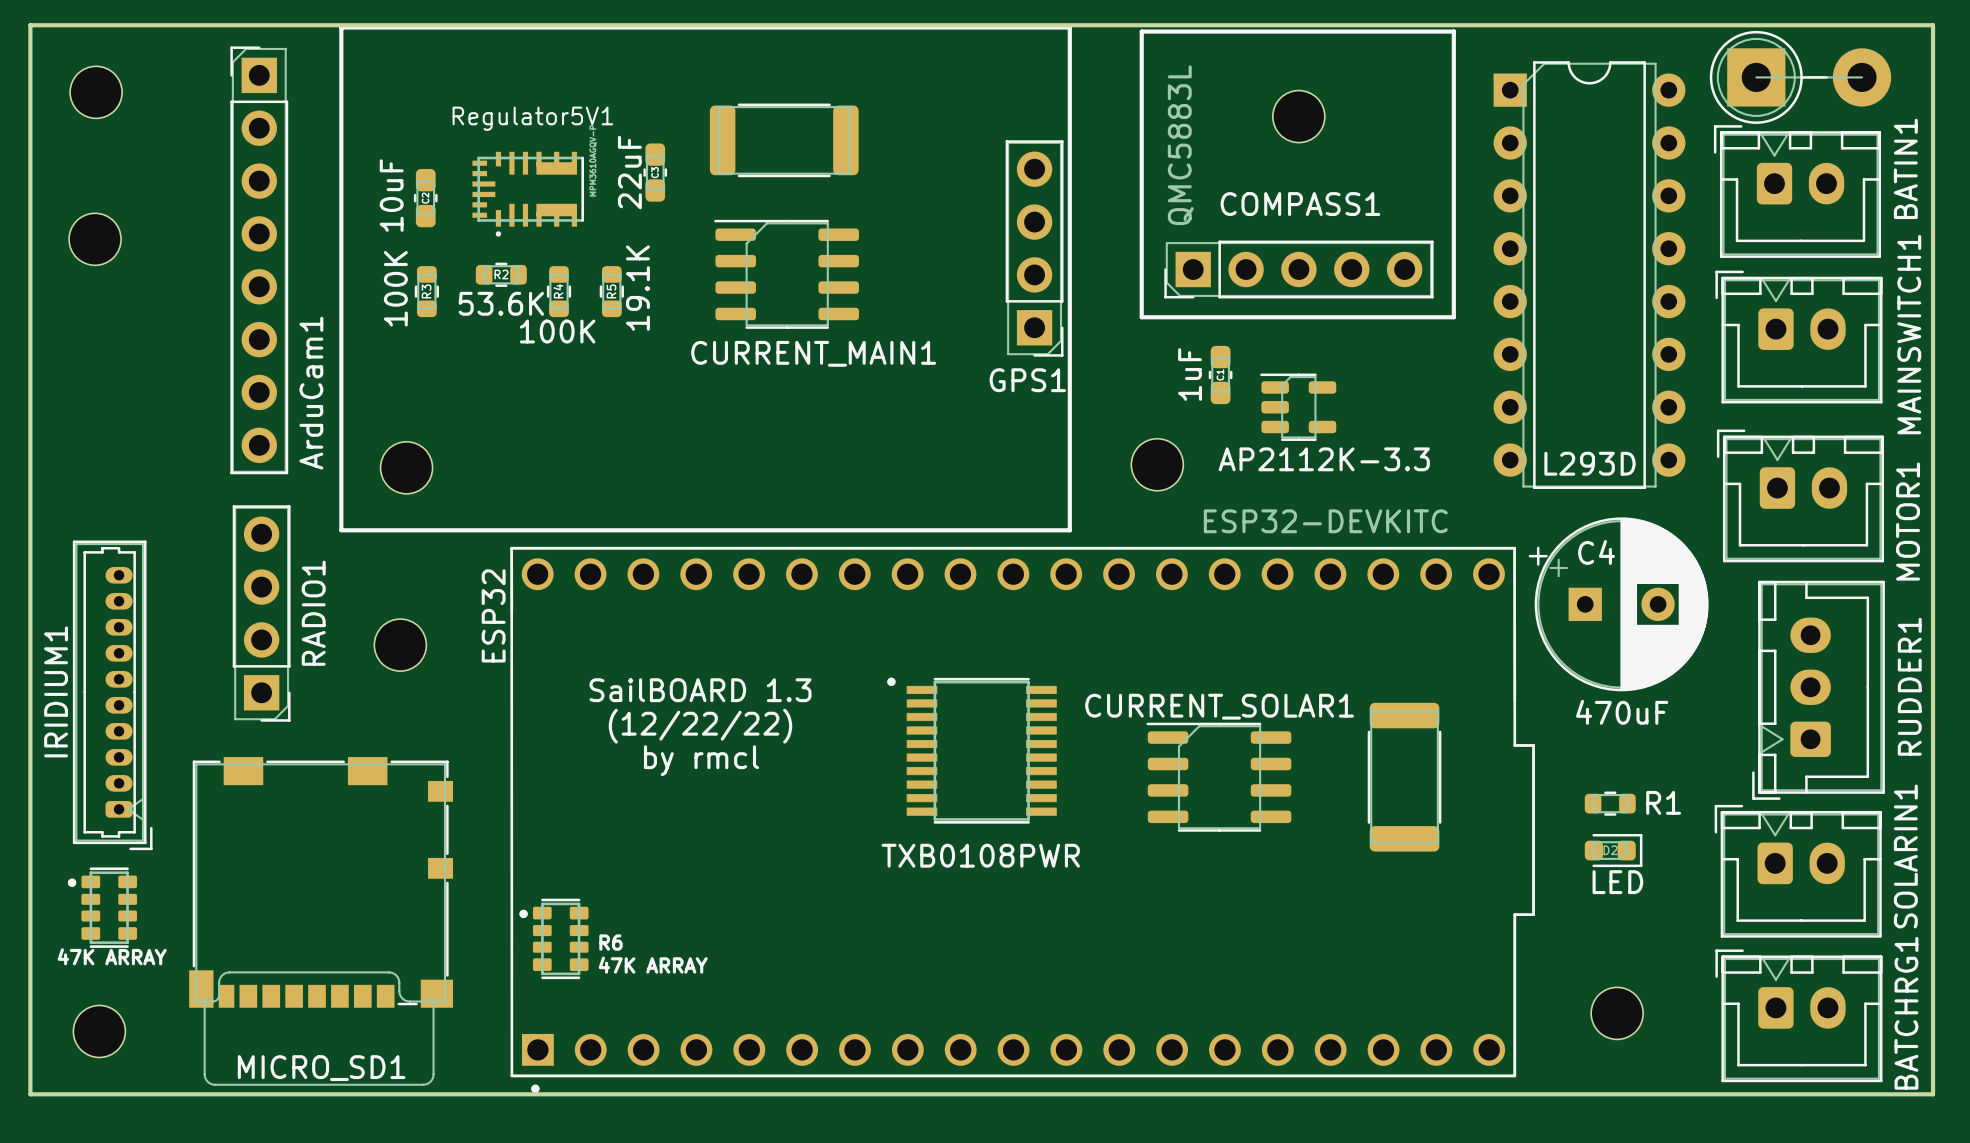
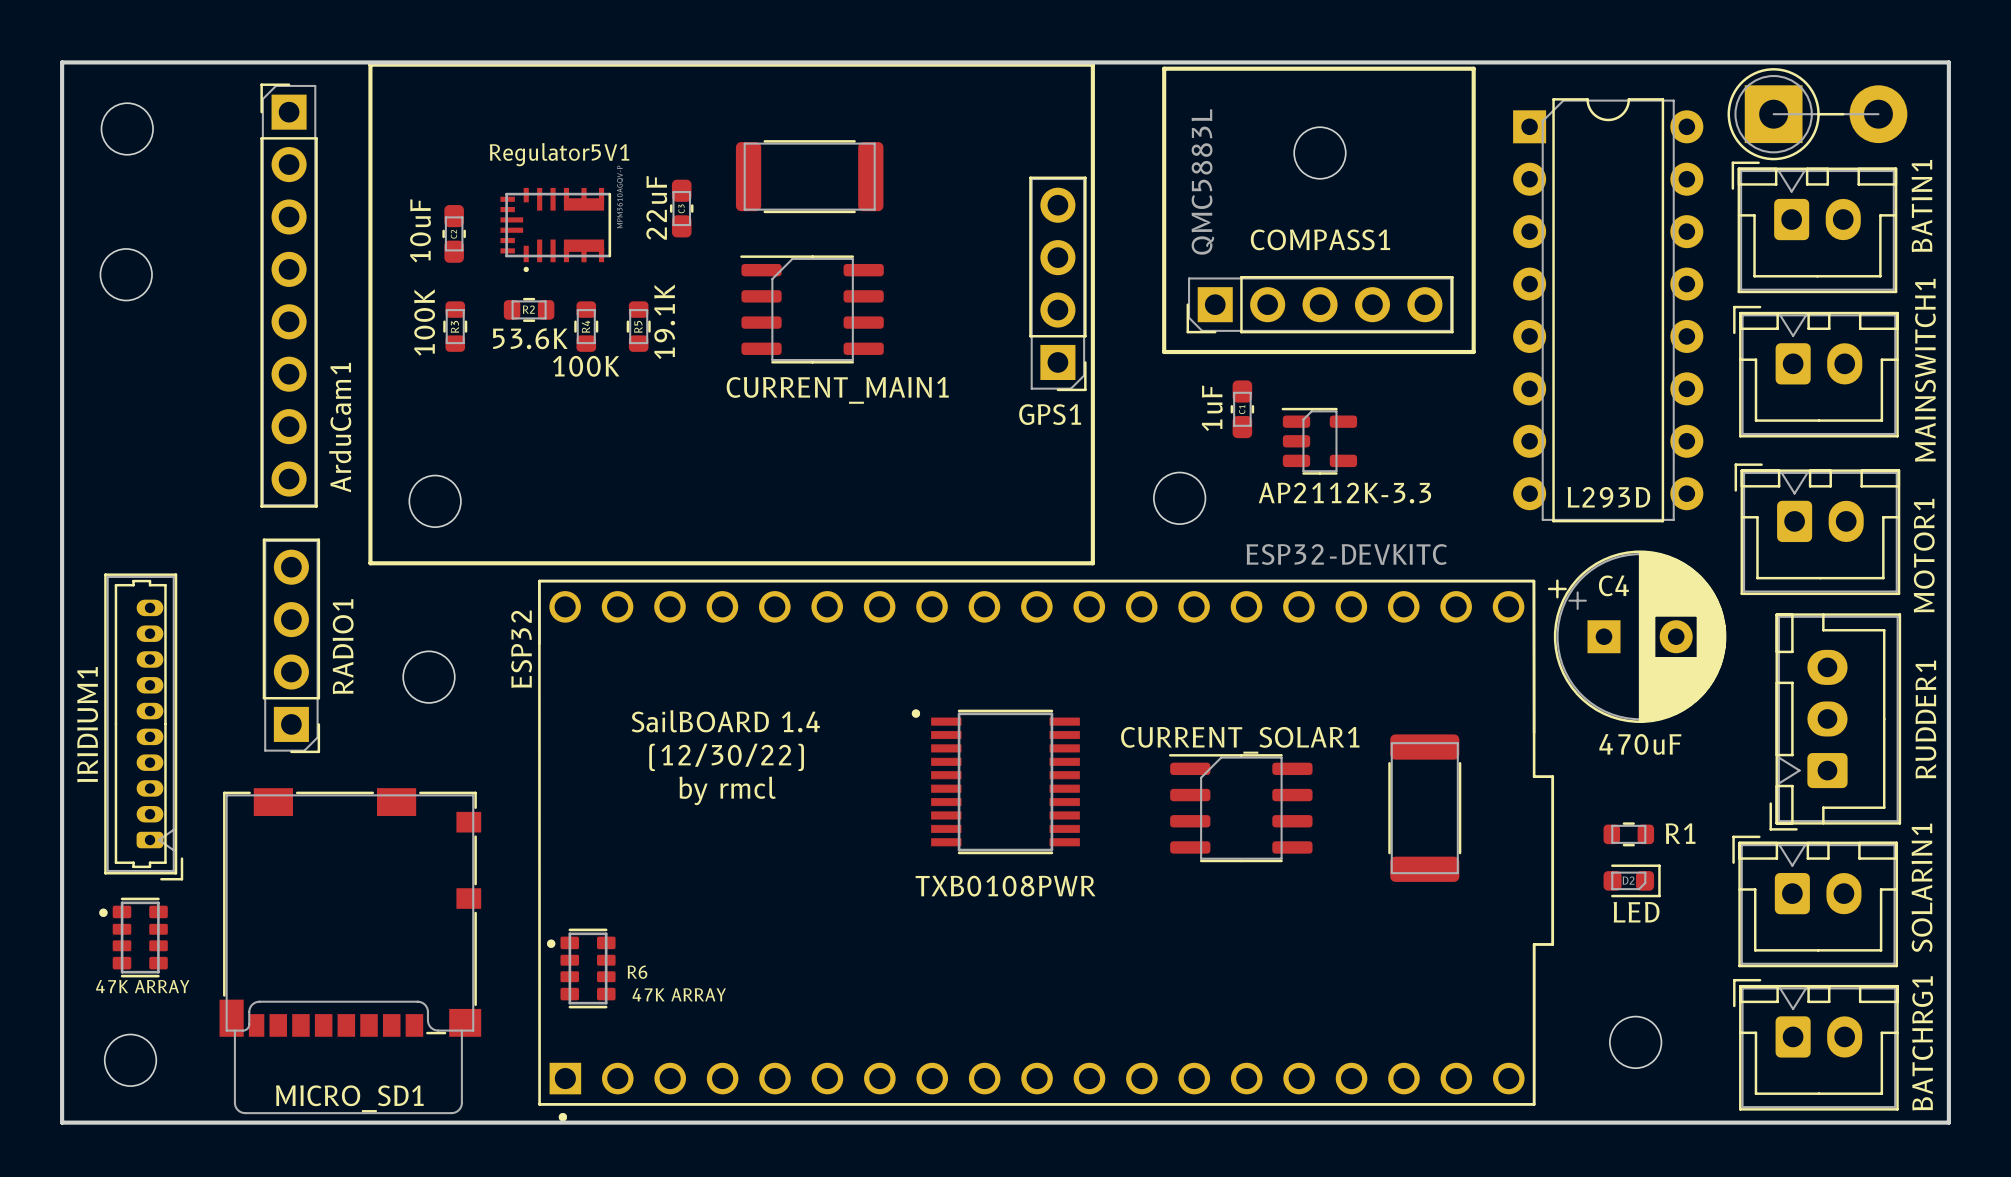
text: SailBOARD 1.3 (700, 690) -> SailBOARD 1.4 (725, 721)
text: (12/22/22) (700, 726) -> (12/30/22) (726, 757)

